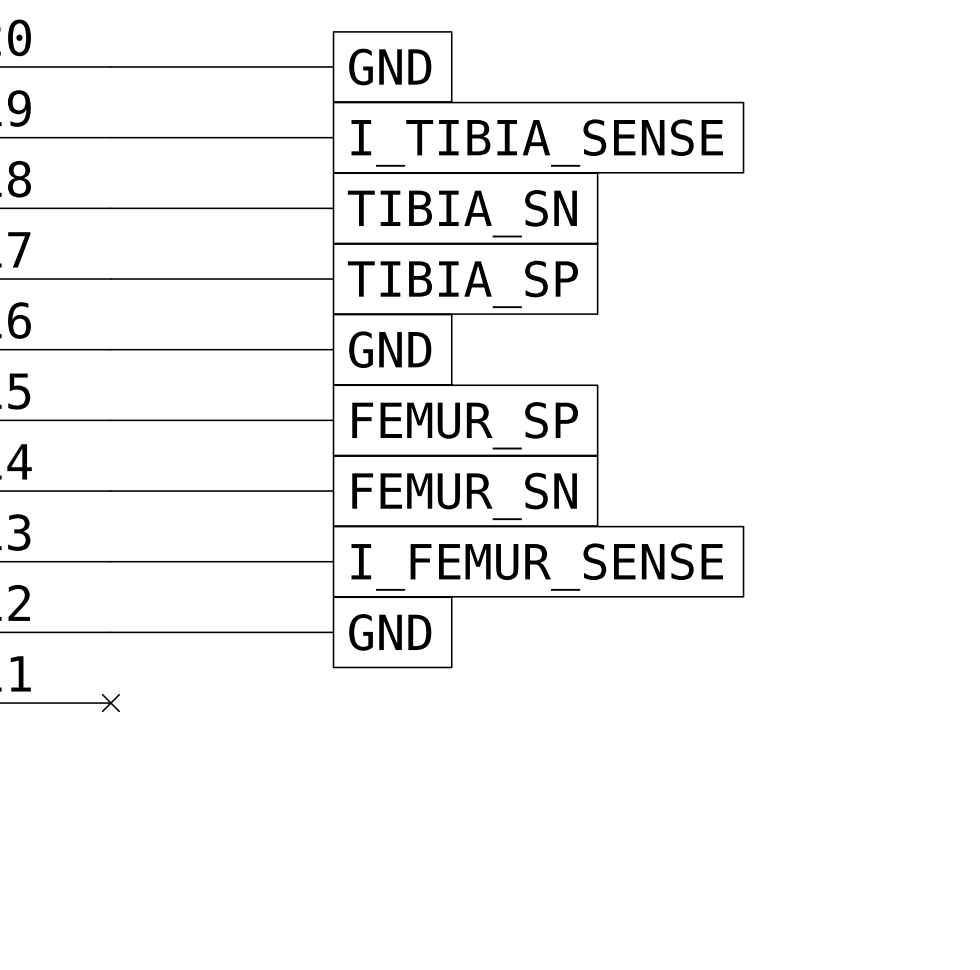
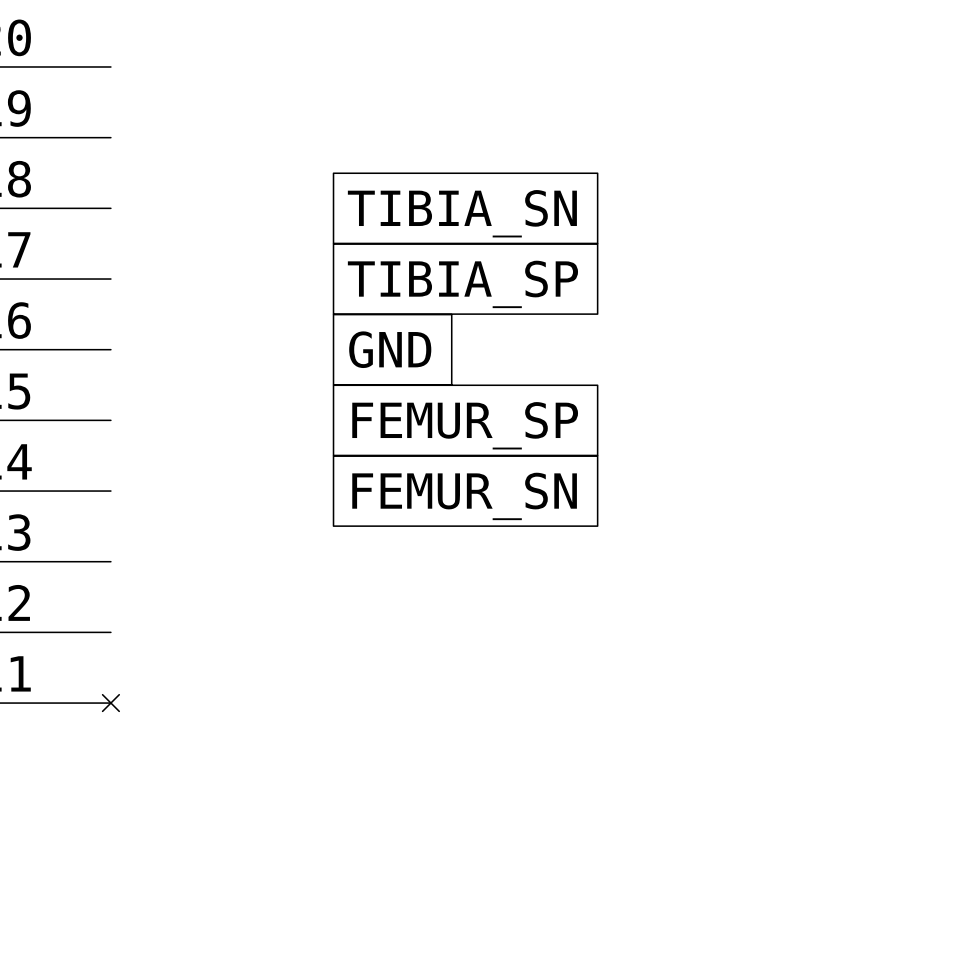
wire: (110, 66) (333, 66) -> none
global label: GND (390, 67) -> none
wire: (110, 137) (333, 137) -> none
global label: I_TIBIA_SENSE (537, 143) -> none
wire: (110, 208) (333, 208) -> none
wire: (110, 279) (333, 279) -> none
wire: (110, 349) (333, 349) -> none
wire: (110, 420) (333, 420) -> none
wire: (110, 491) (333, 491) -> none
wire: (110, 561) (333, 561) -> none
global label: I_FEMUR_SENSE (537, 567) -> none
wire: (110, 632) (333, 632) -> none
global label: GND (390, 632) -> none

